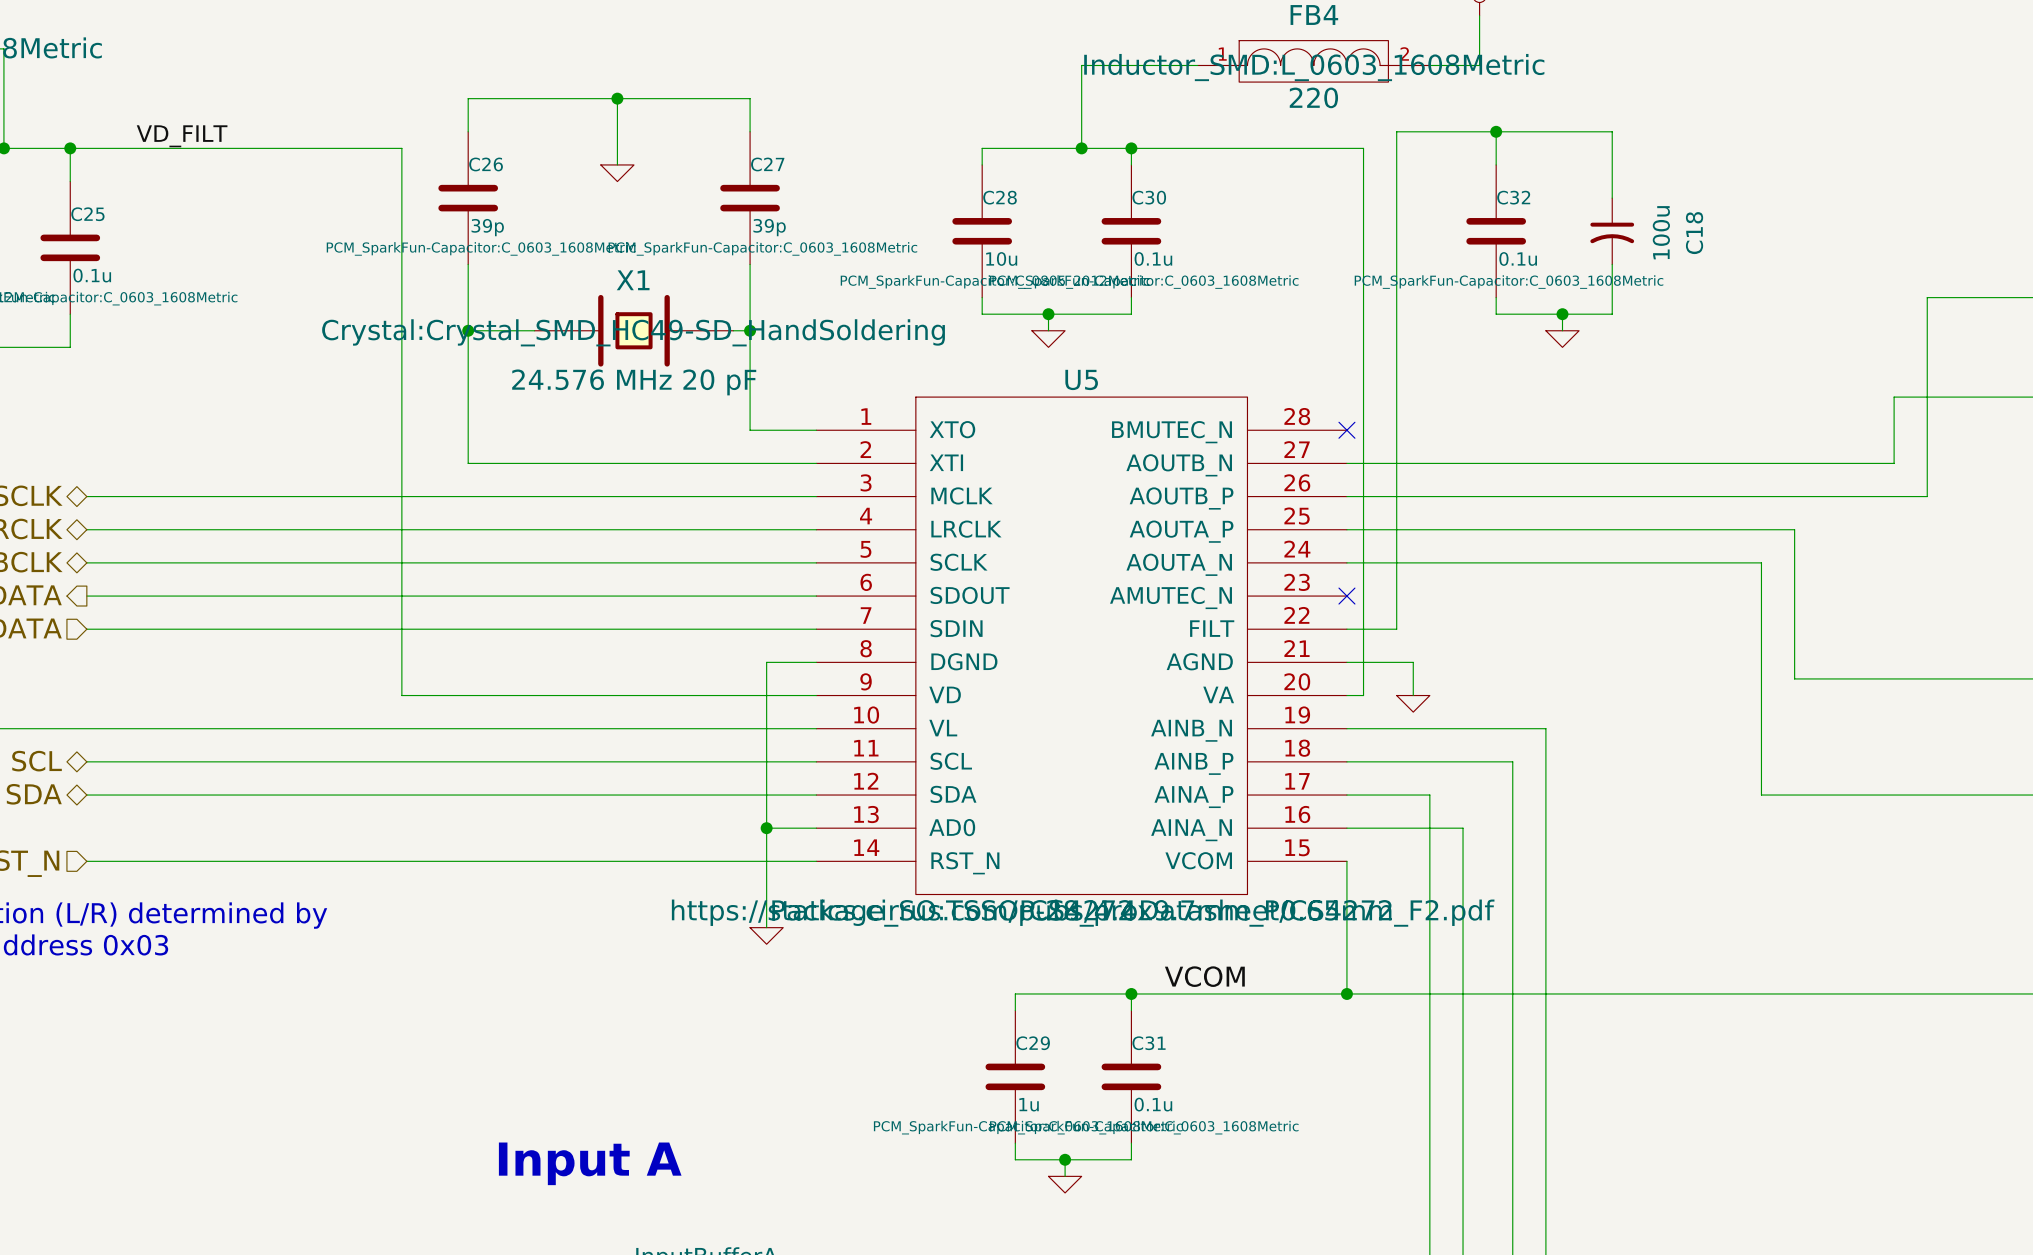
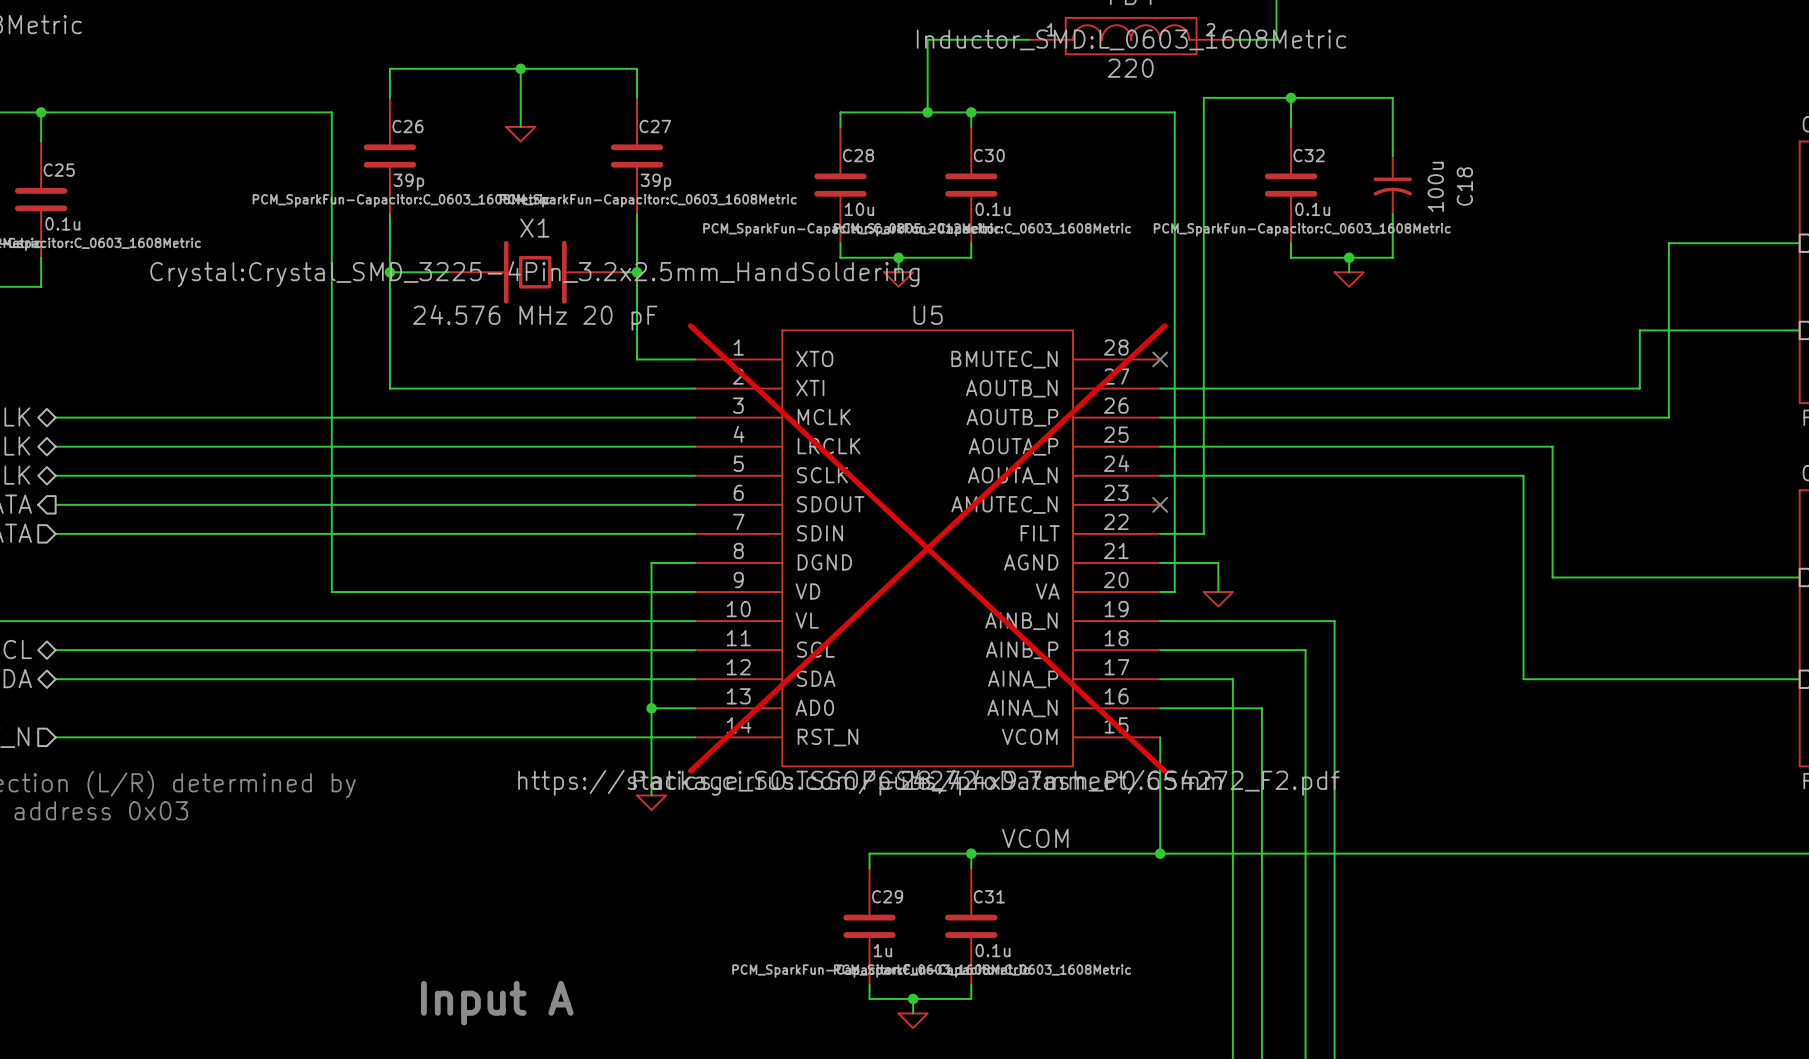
label: VD_FILT (182, 136) -> none
X1 text: Crystal:Crystal_SMD_HC49-SD_HandSoldering (633, 332) -> Crystal:Crystal_SMD_3225-4Pin_3.2x2.5mm_HandSoldering (534, 274)
U5 do-not-place cross: none -> (927, 548)

